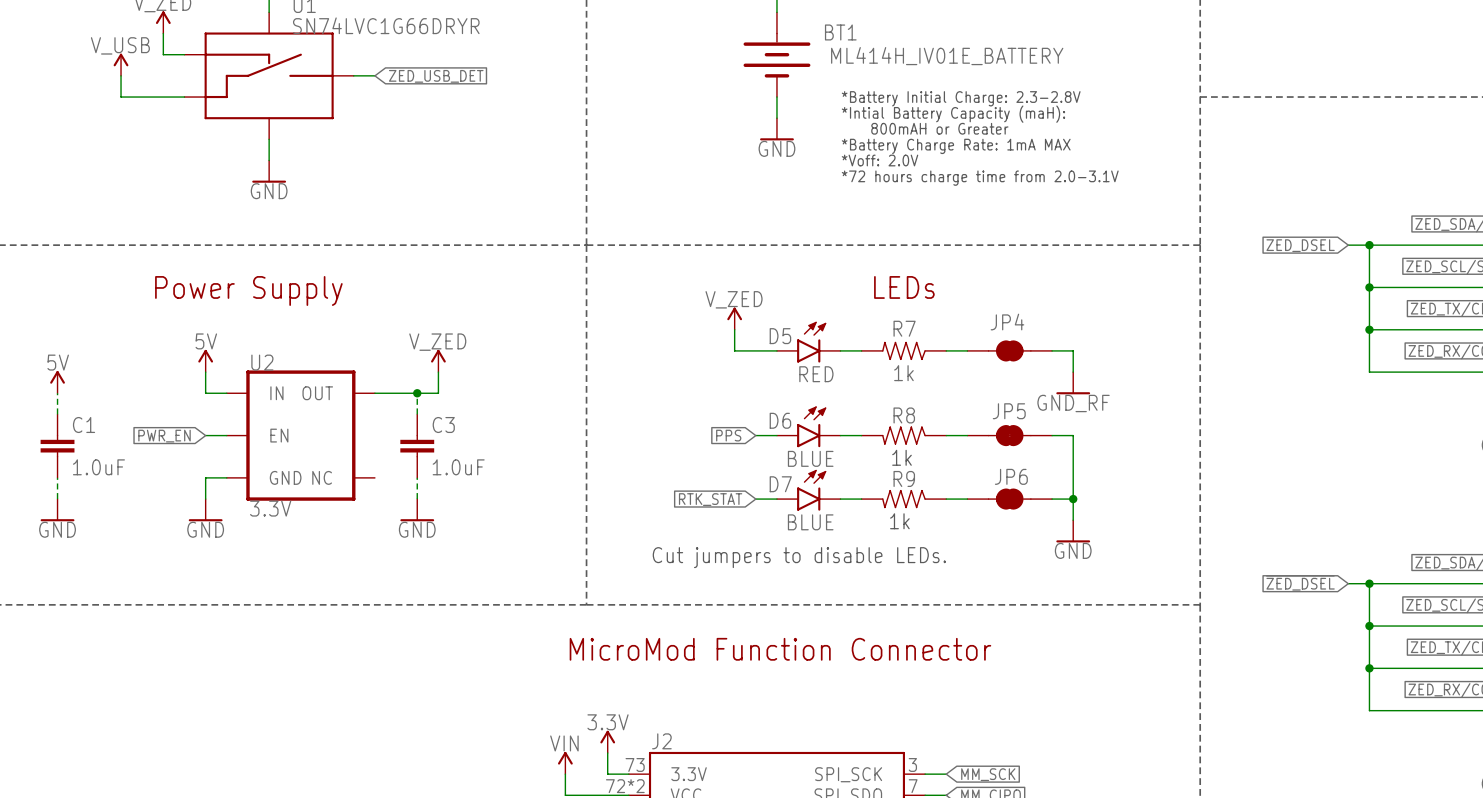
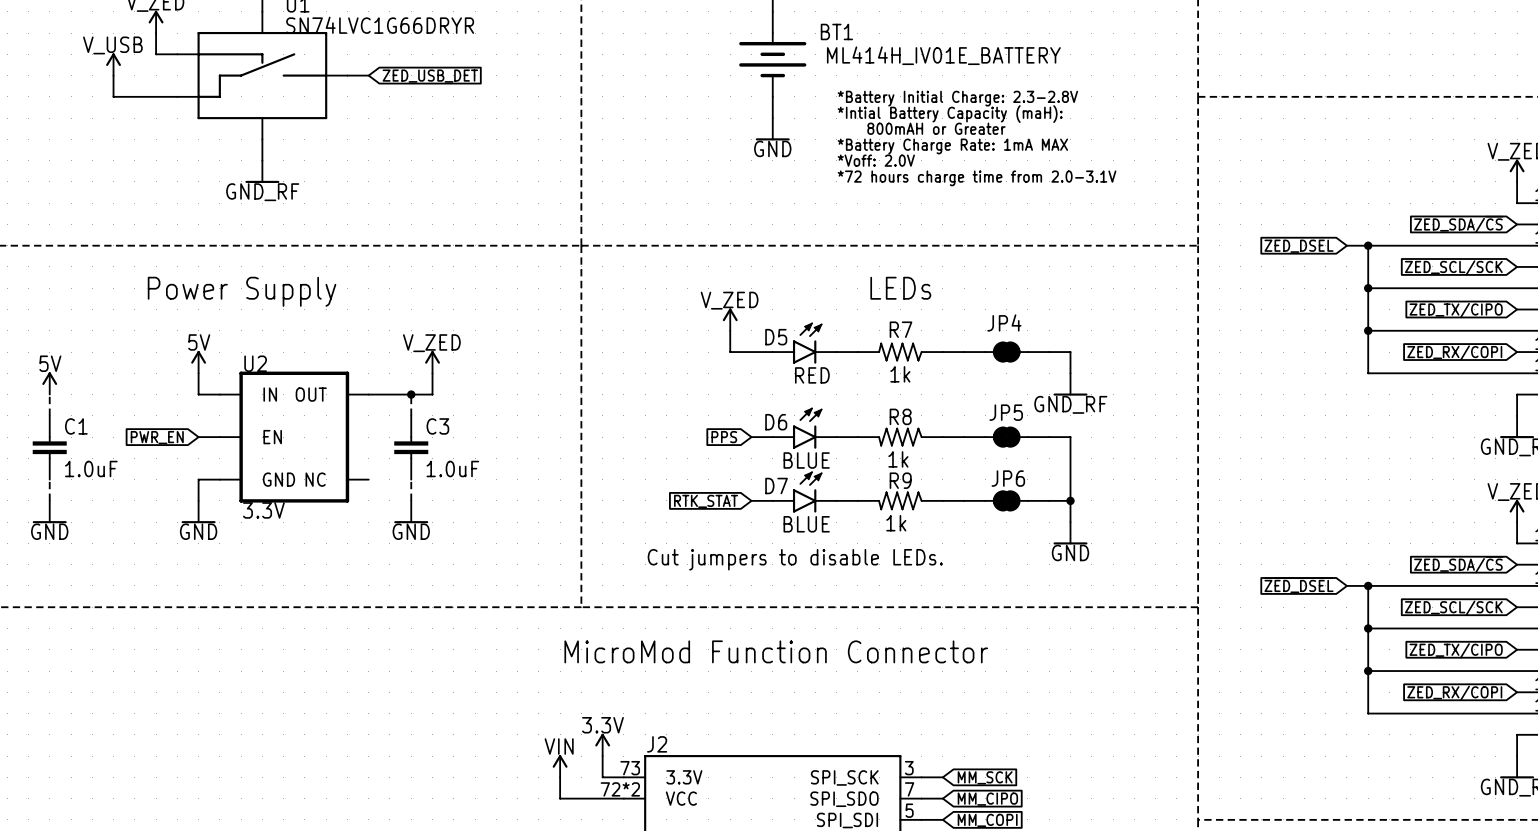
power symbol: GND (269, 171) -> GND_RF (262, 171)

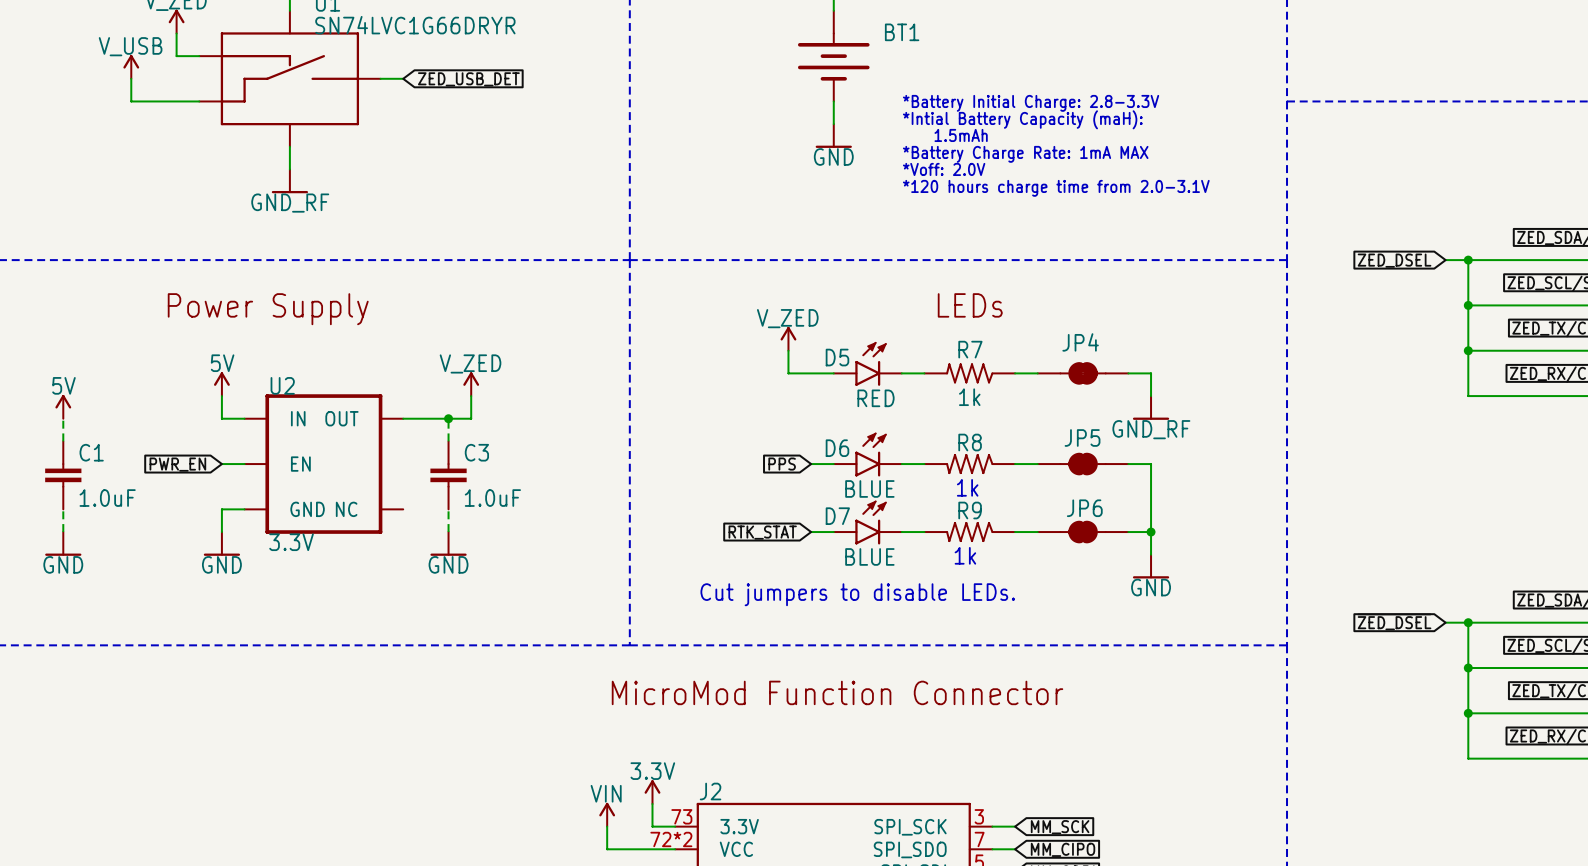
BT1 value: ML414H_IV01E_BATTERY (943, 55) -> none
text: *Battery Initial Charge: 2.3-2.8V (957, 98) -> *Battery Initial Charge: 2.8-3.3V (1031, 103)
text: 800mAH or Greater (936, 128) -> 1.5mAh (961, 135)
text: *72 hours charge time from 2.0-3.1V (977, 178) -> *120 hours charge time from 2.0-3.1V (1056, 188)

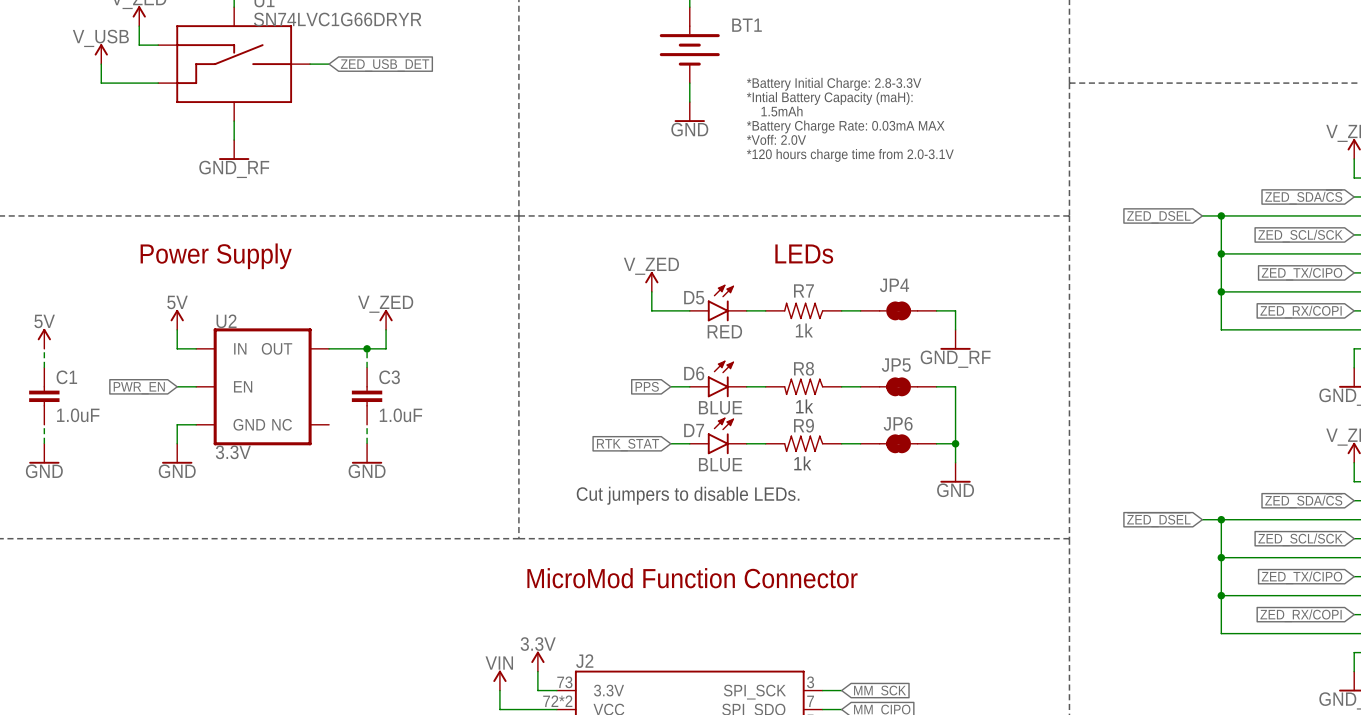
text: *Battery Charge Rate: 1mA MAX (1025, 154) -> *Battery Charge Rate: 0.03mA MAX (845, 126)

